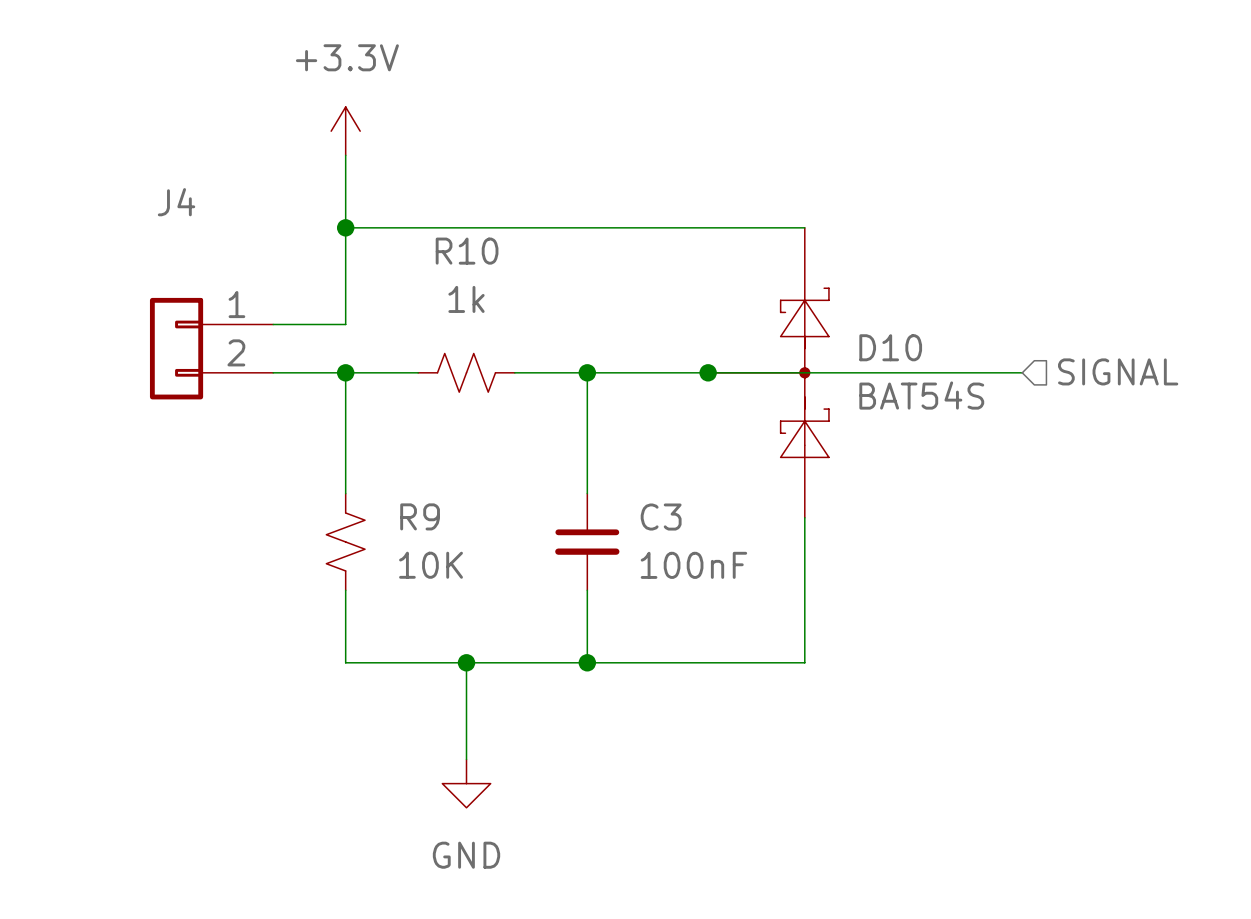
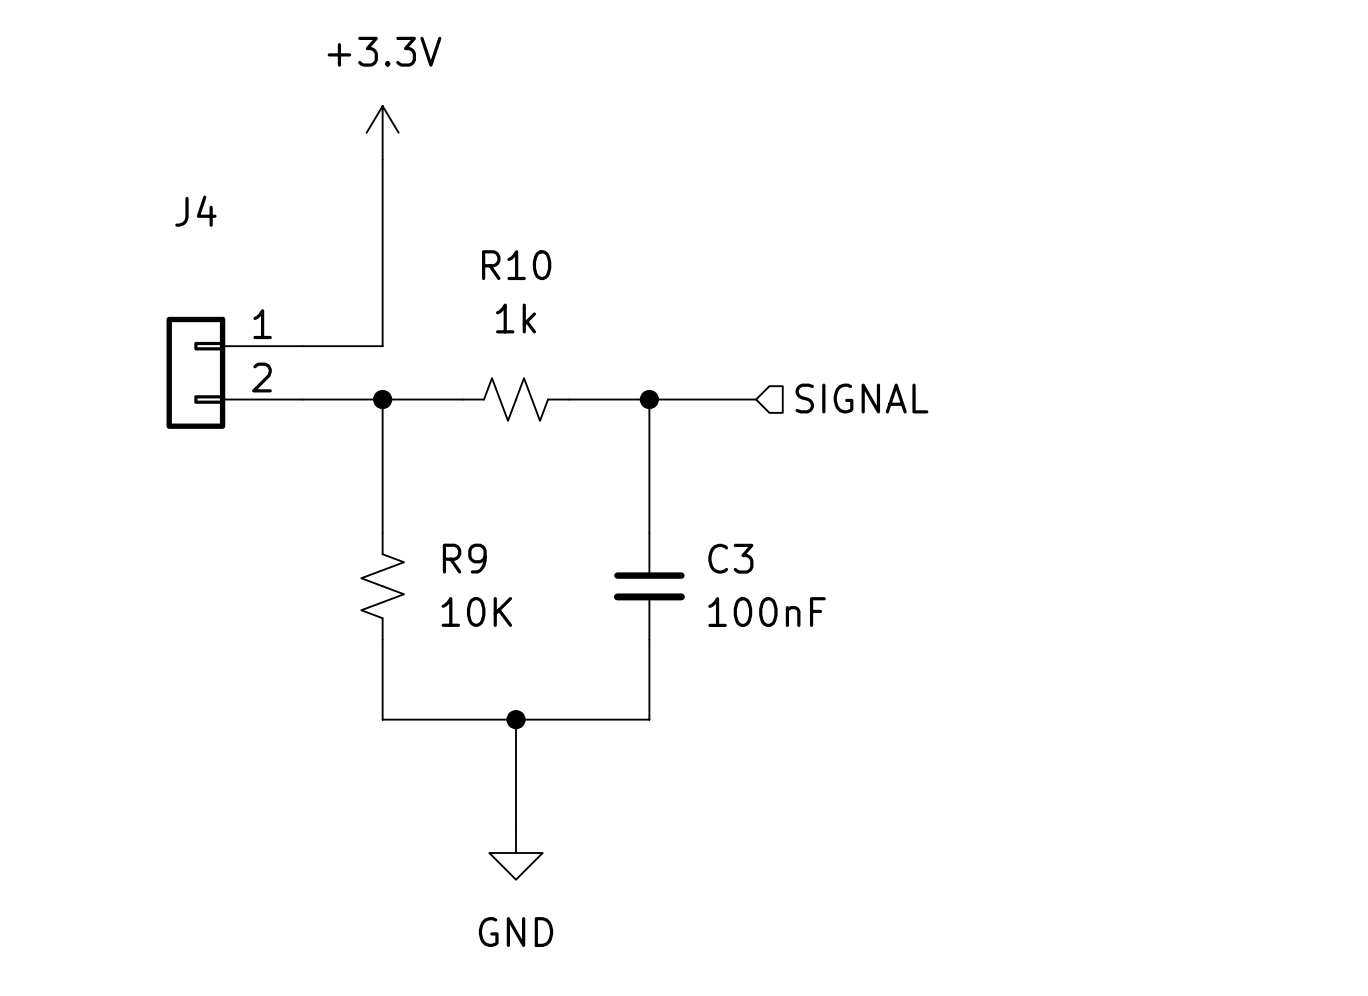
wire: (345, 227) (804, 227) -> none
junction: (345, 227) -> none
hierarchical label position: SIGNAL (1118, 371) -> SIGNAL (861, 398)
wire: (683, 372) (1022, 372) -> none
junction: (708, 372) -> none
D10: BAT54S (768, 372) -> none
wire: (804, 517) (804, 662) (587, 662) -> none
junction: (587, 662) -> none

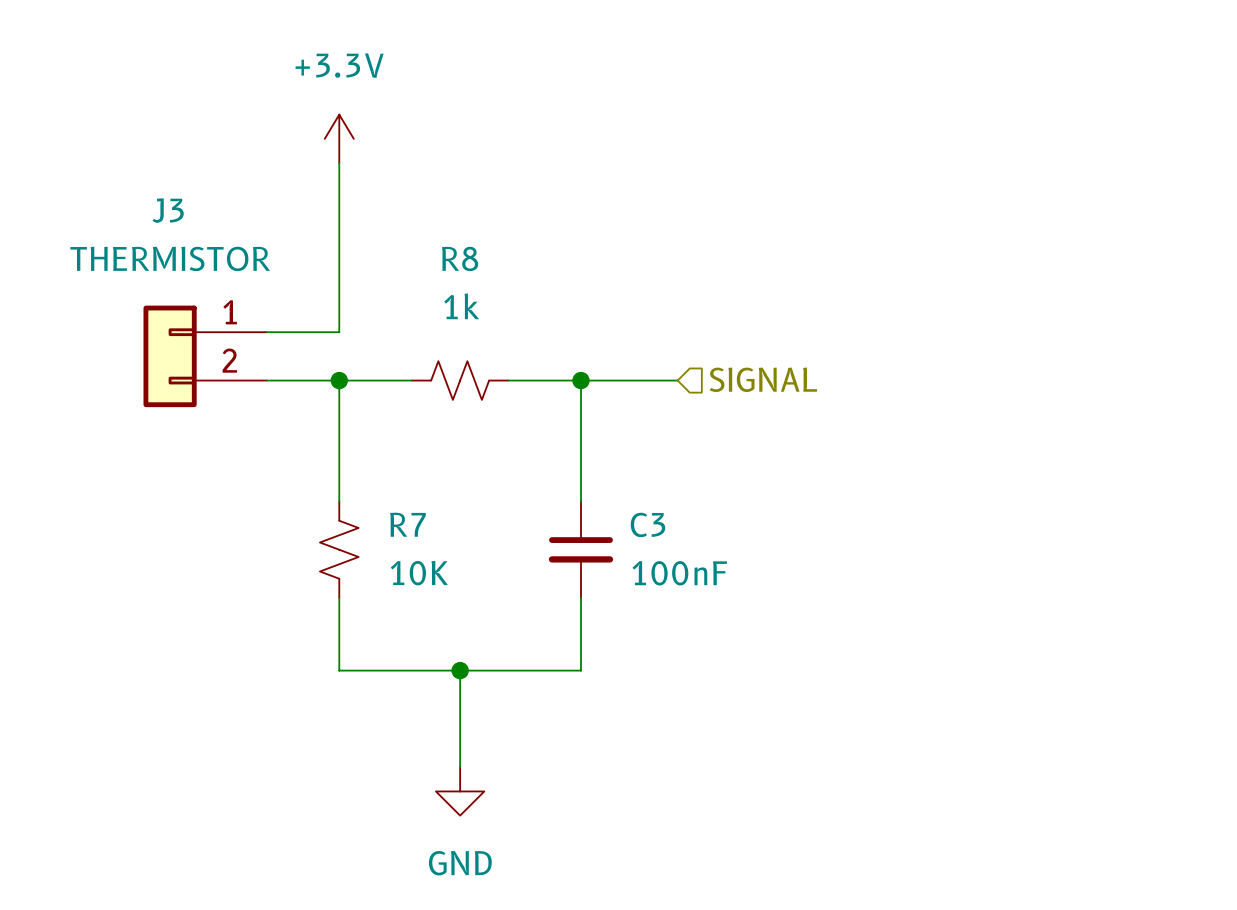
J4 name: J4 (195, 211) -> J3 (168, 210)
J4 value: none -> THERMISTOR (170, 258)
R10 name: R10 (516, 265) -> R8 (460, 258)
R9 name: R9 (464, 558) -> R7 (407, 524)

